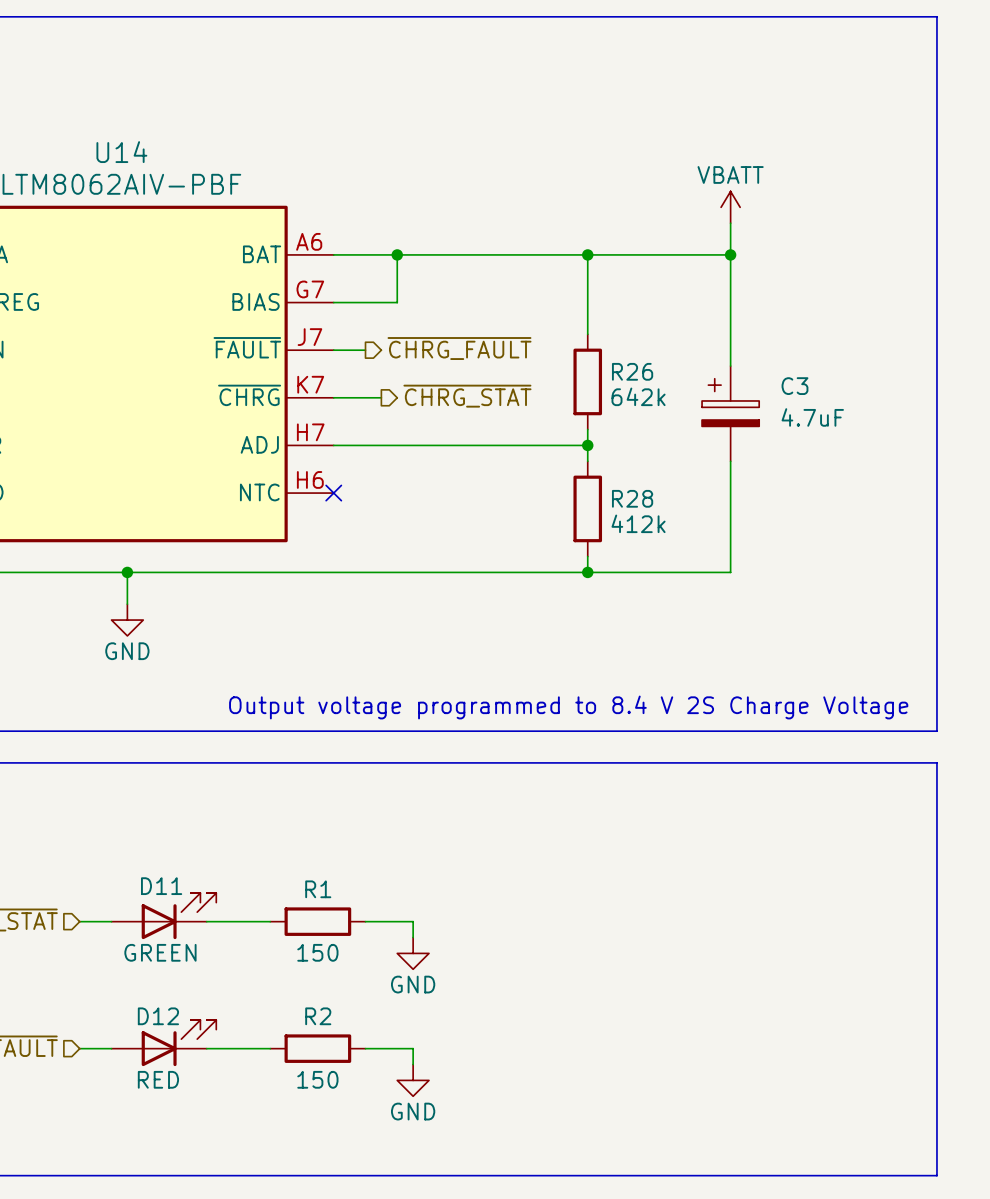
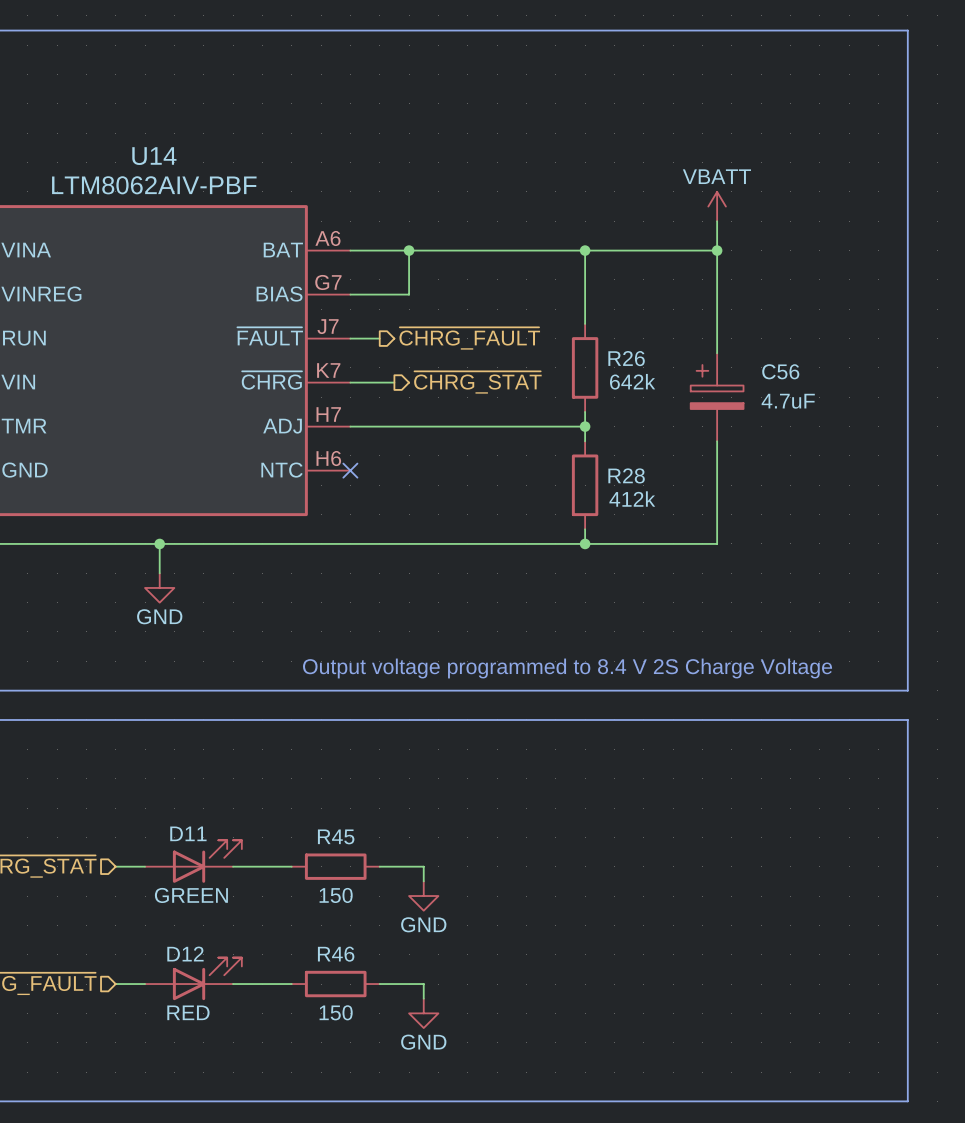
C3 name: C3 (794, 386) -> C56 (780, 371)
R1 name: R1 (318, 889) -> R45 (336, 836)
R2 name: R2 (318, 1016) -> R46 (336, 954)

